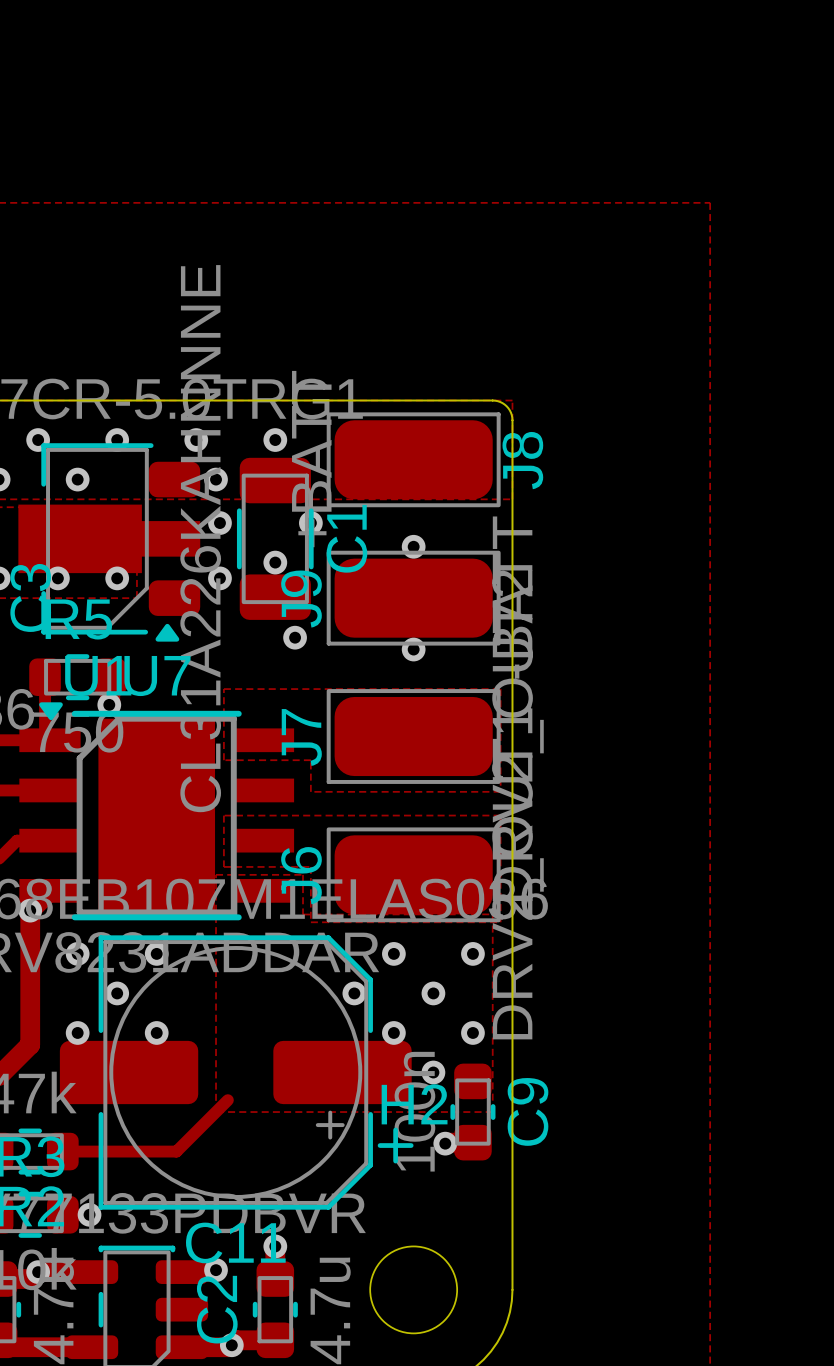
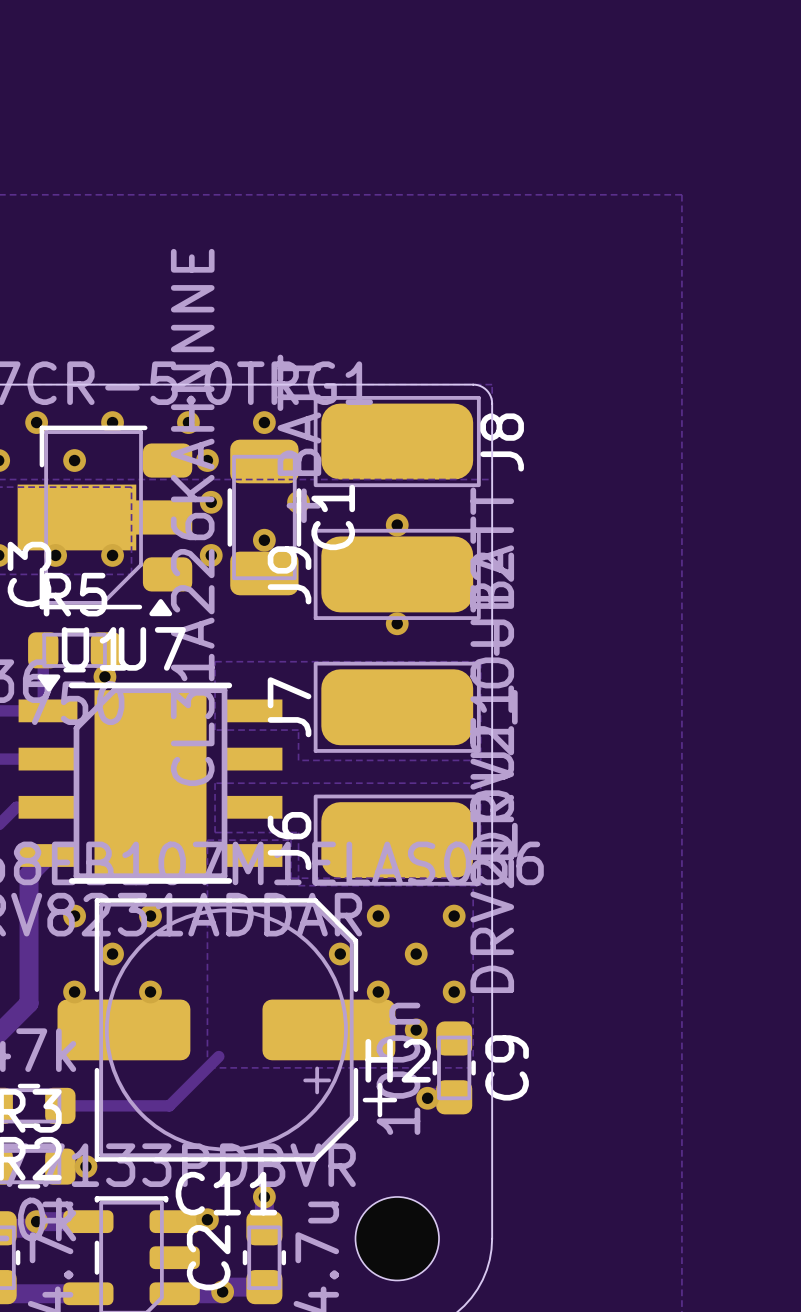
via: (295, 637) -> none
via: (30, 910) -> none

